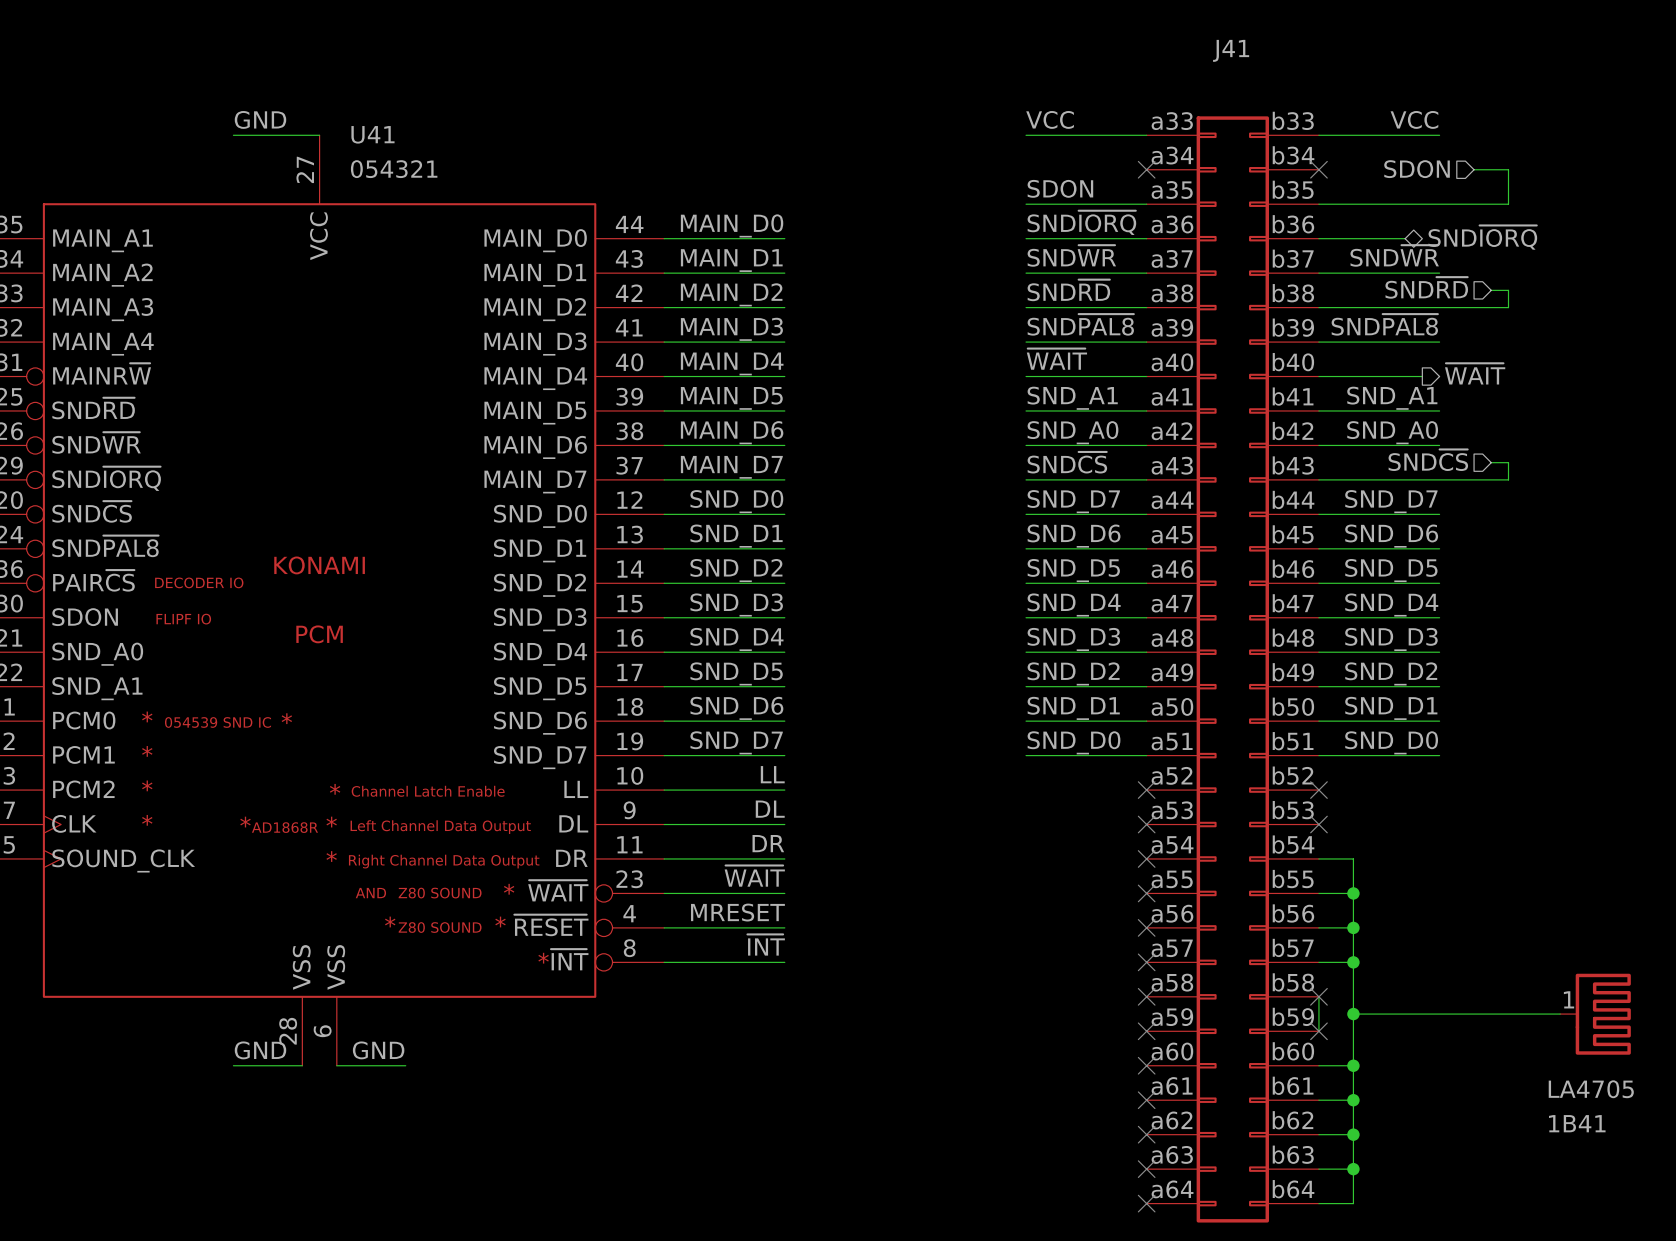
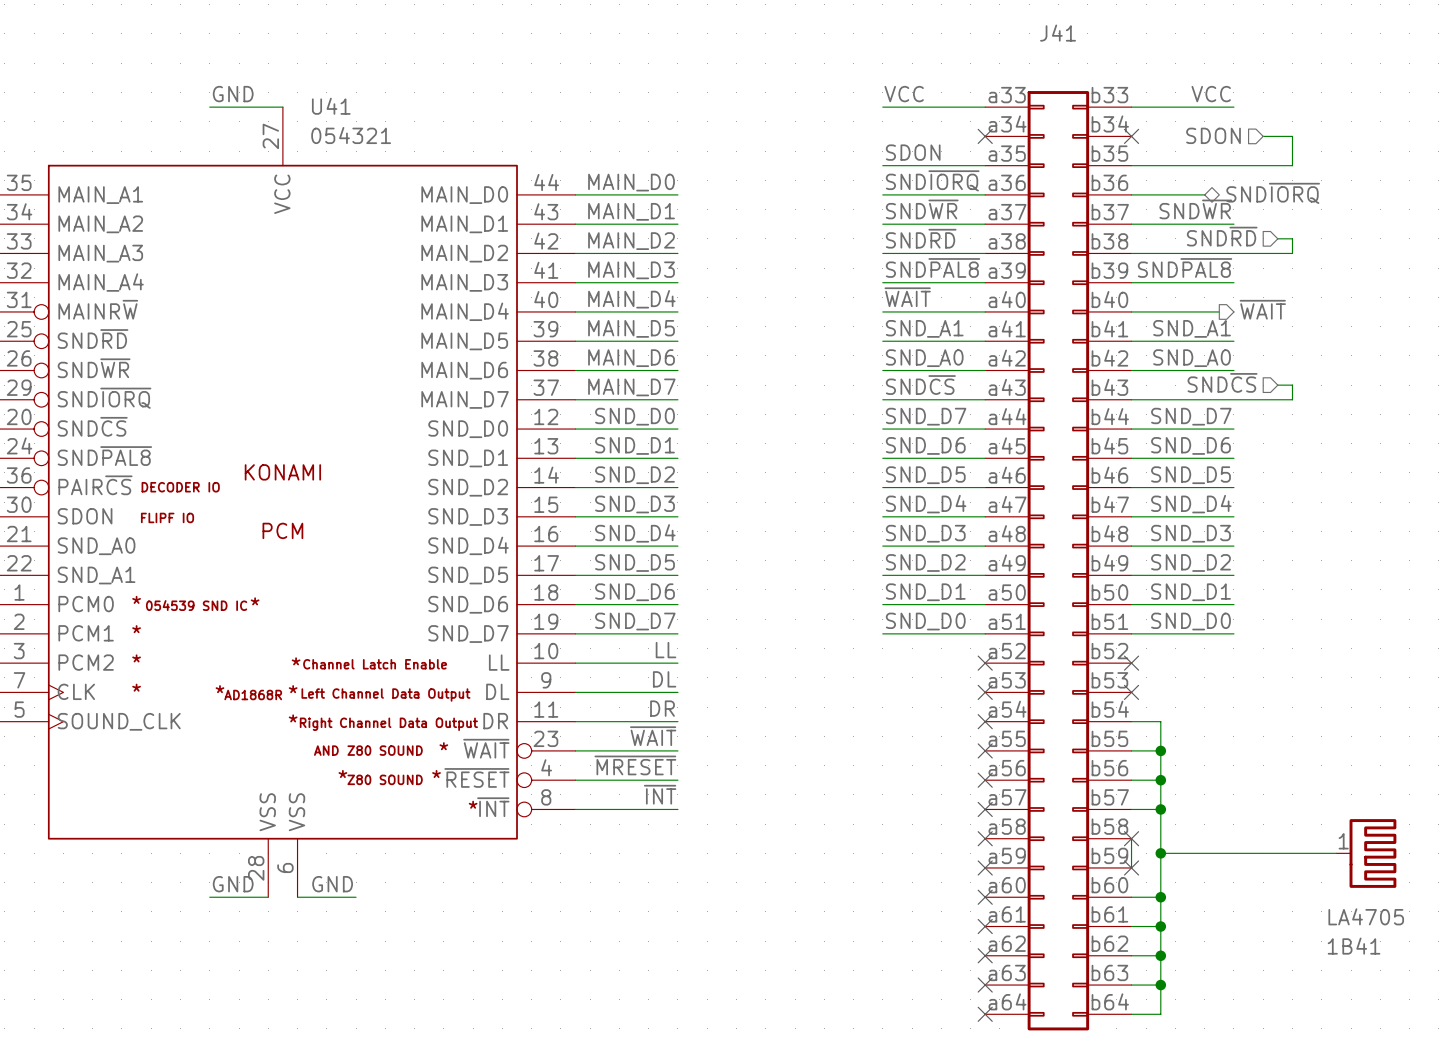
label: MRESET (737, 912) -> ~{MRESET} (635, 765)

